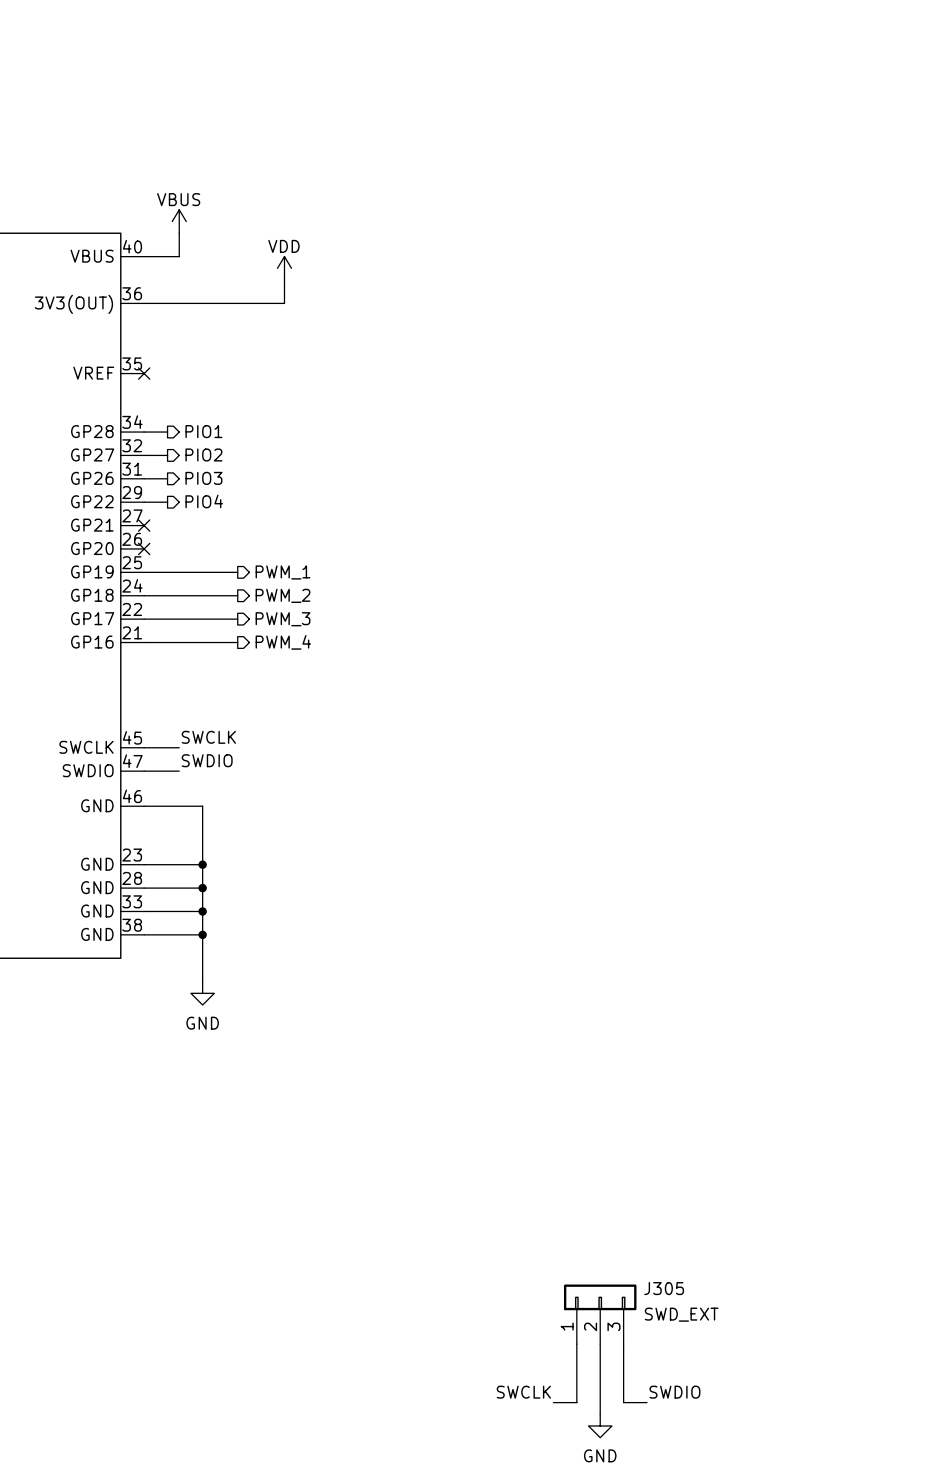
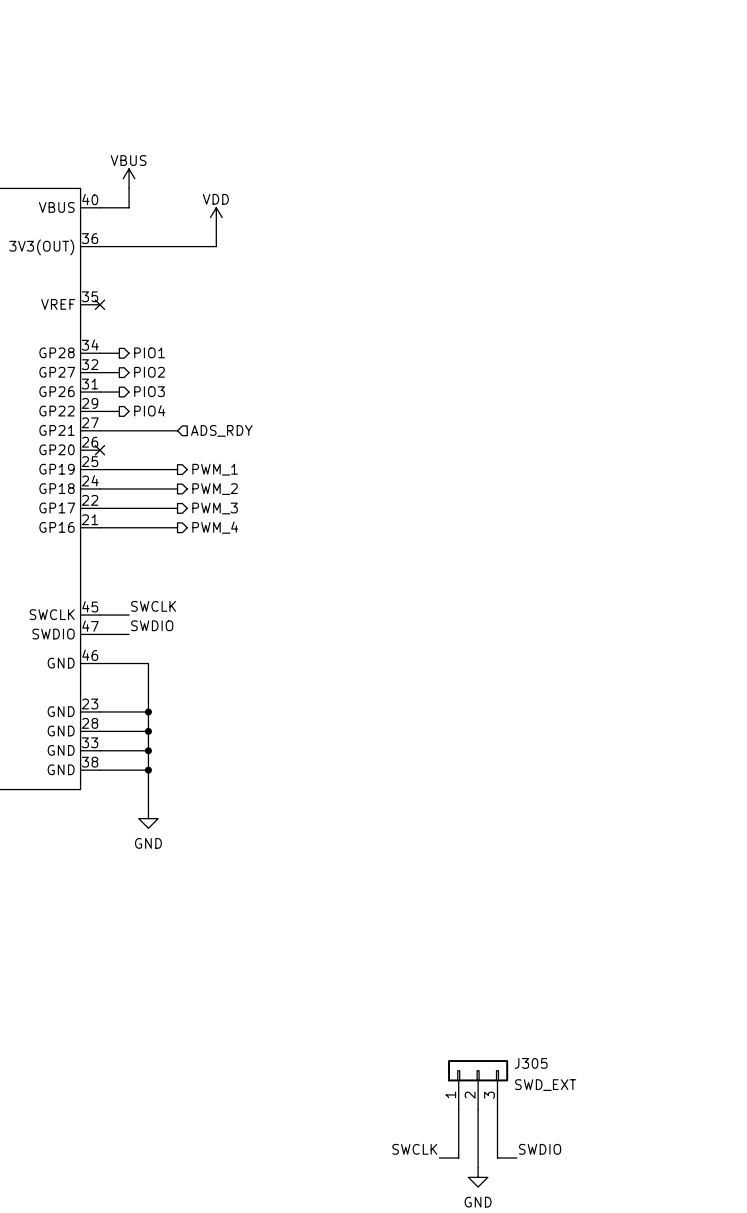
wire: none -> (99, 430) (177, 430)
no-connect mark: (144, 525) -> none
hierarchical label: none -> ADS_RDY (221, 430)

